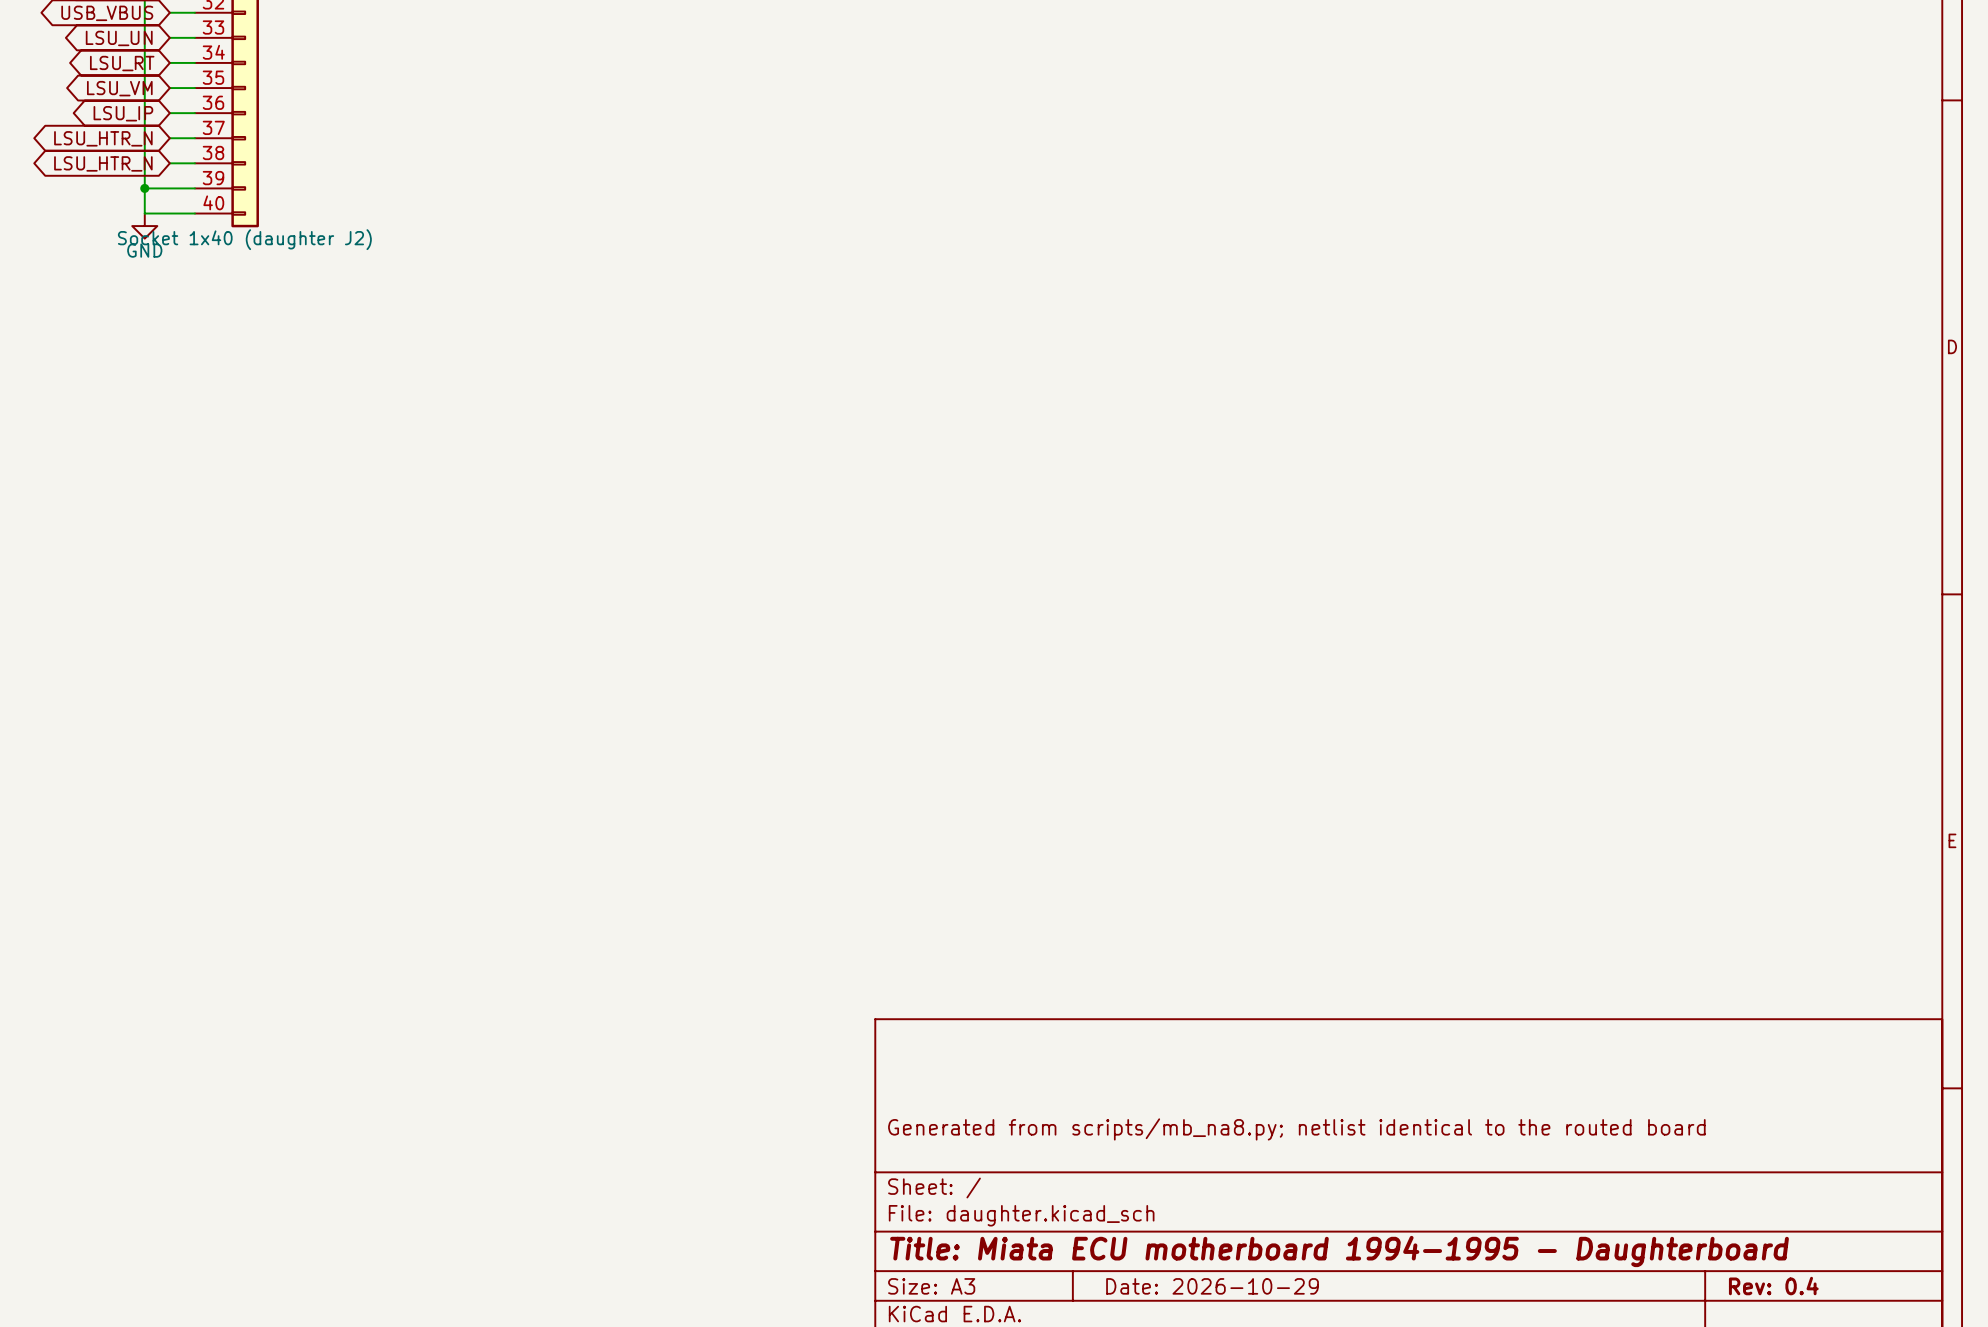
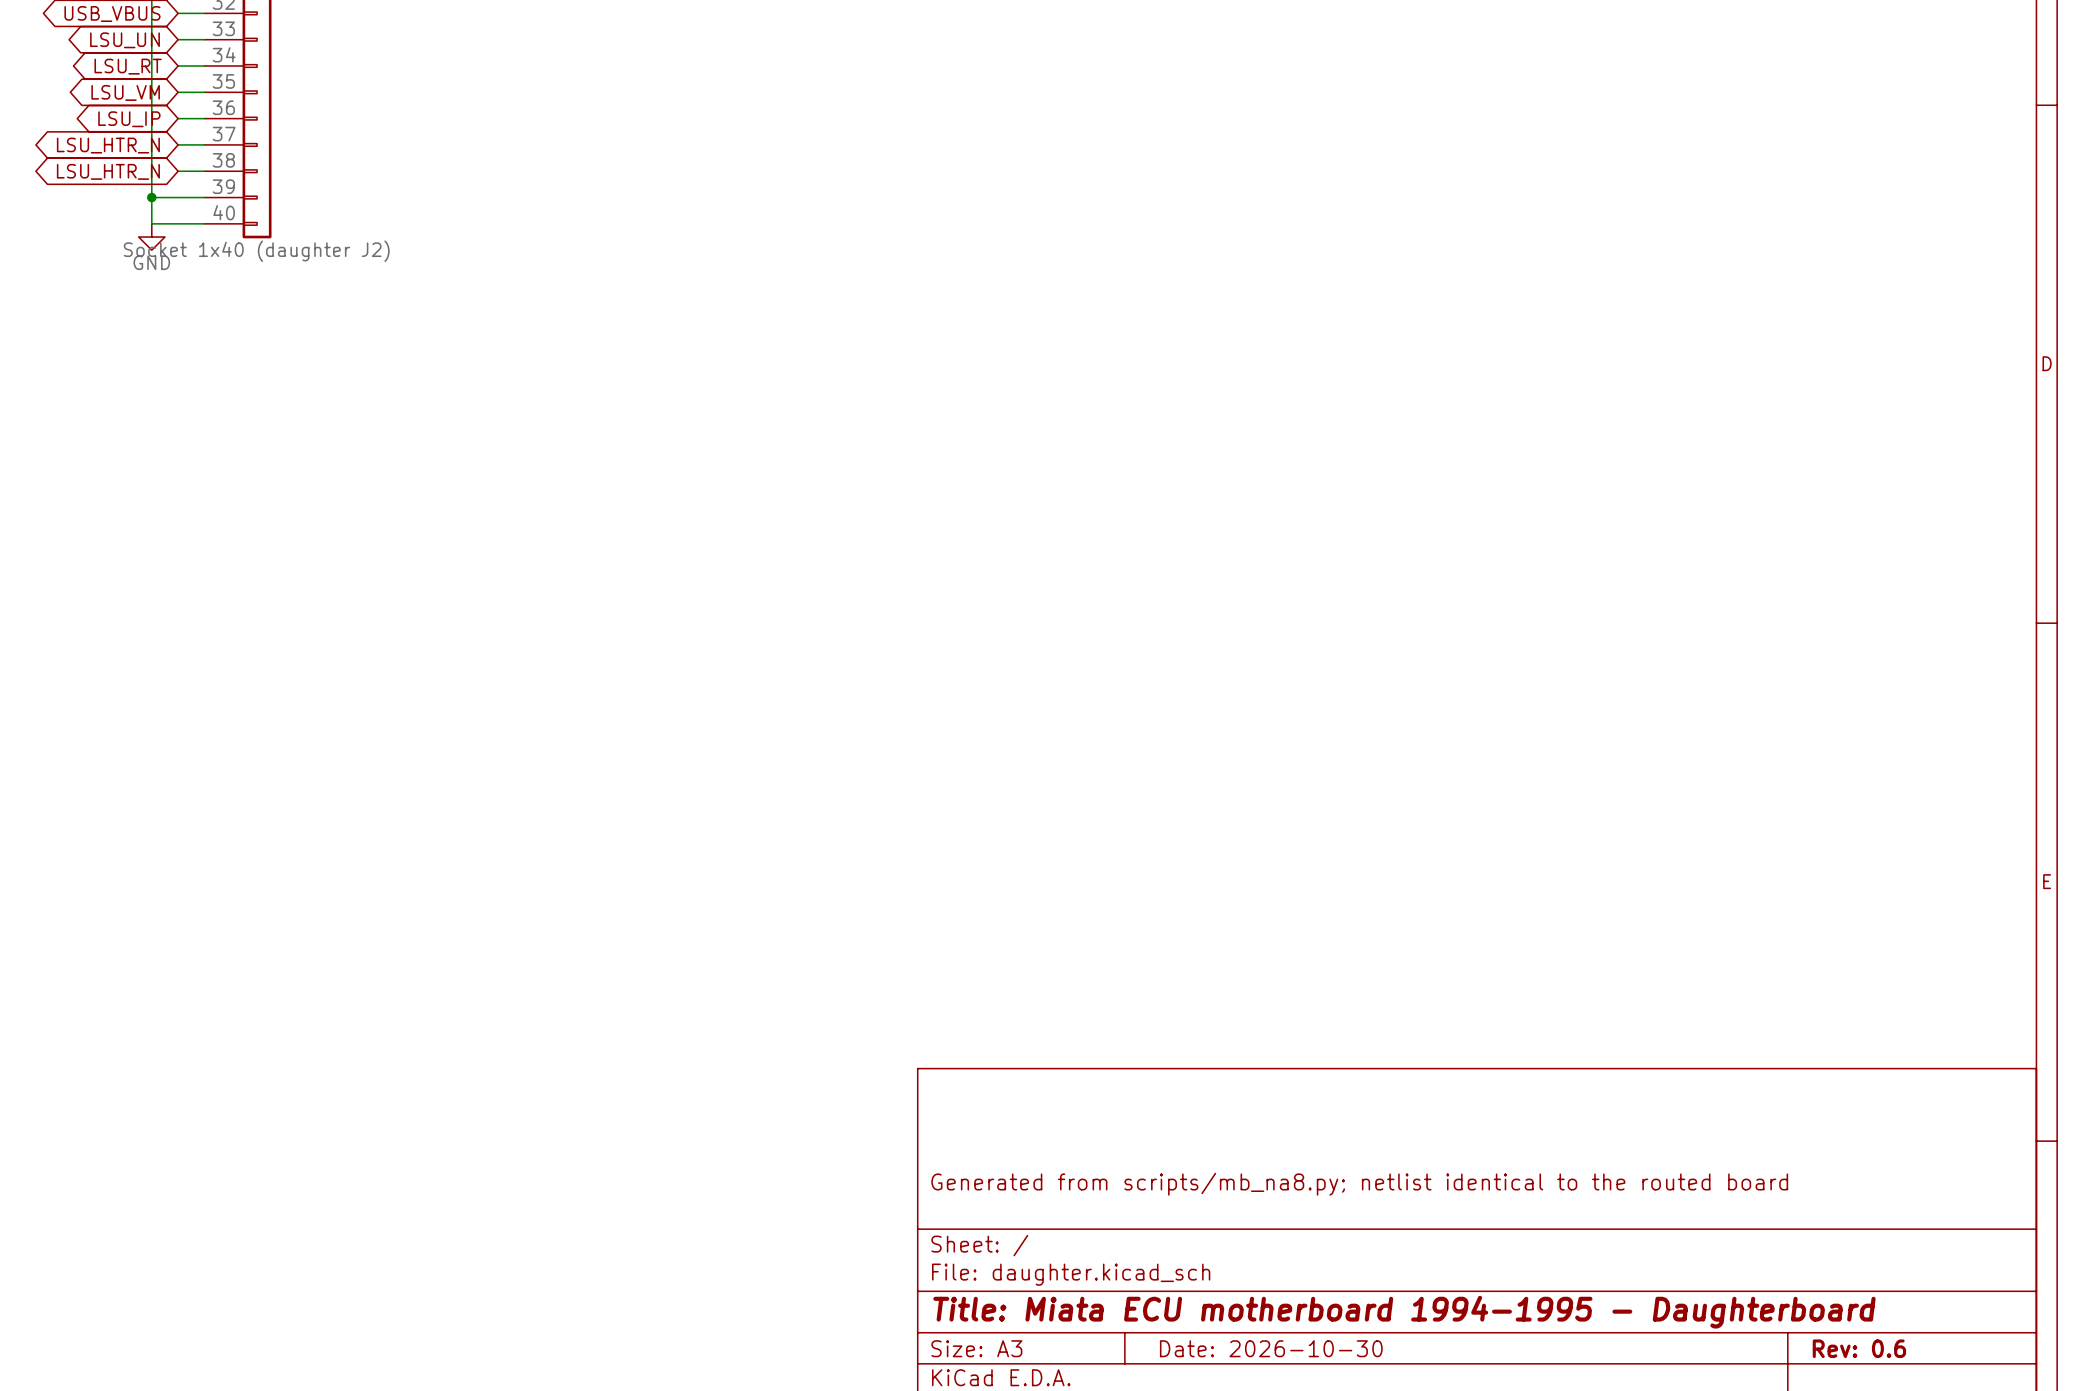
title block: Date: 2026-10-29 (1212, 1286) -> Date: 2026-10-30 (1271, 1348)
title block: Rev: 0.4 (1773, 1286) -> Rev: 0.6 (1859, 1348)

